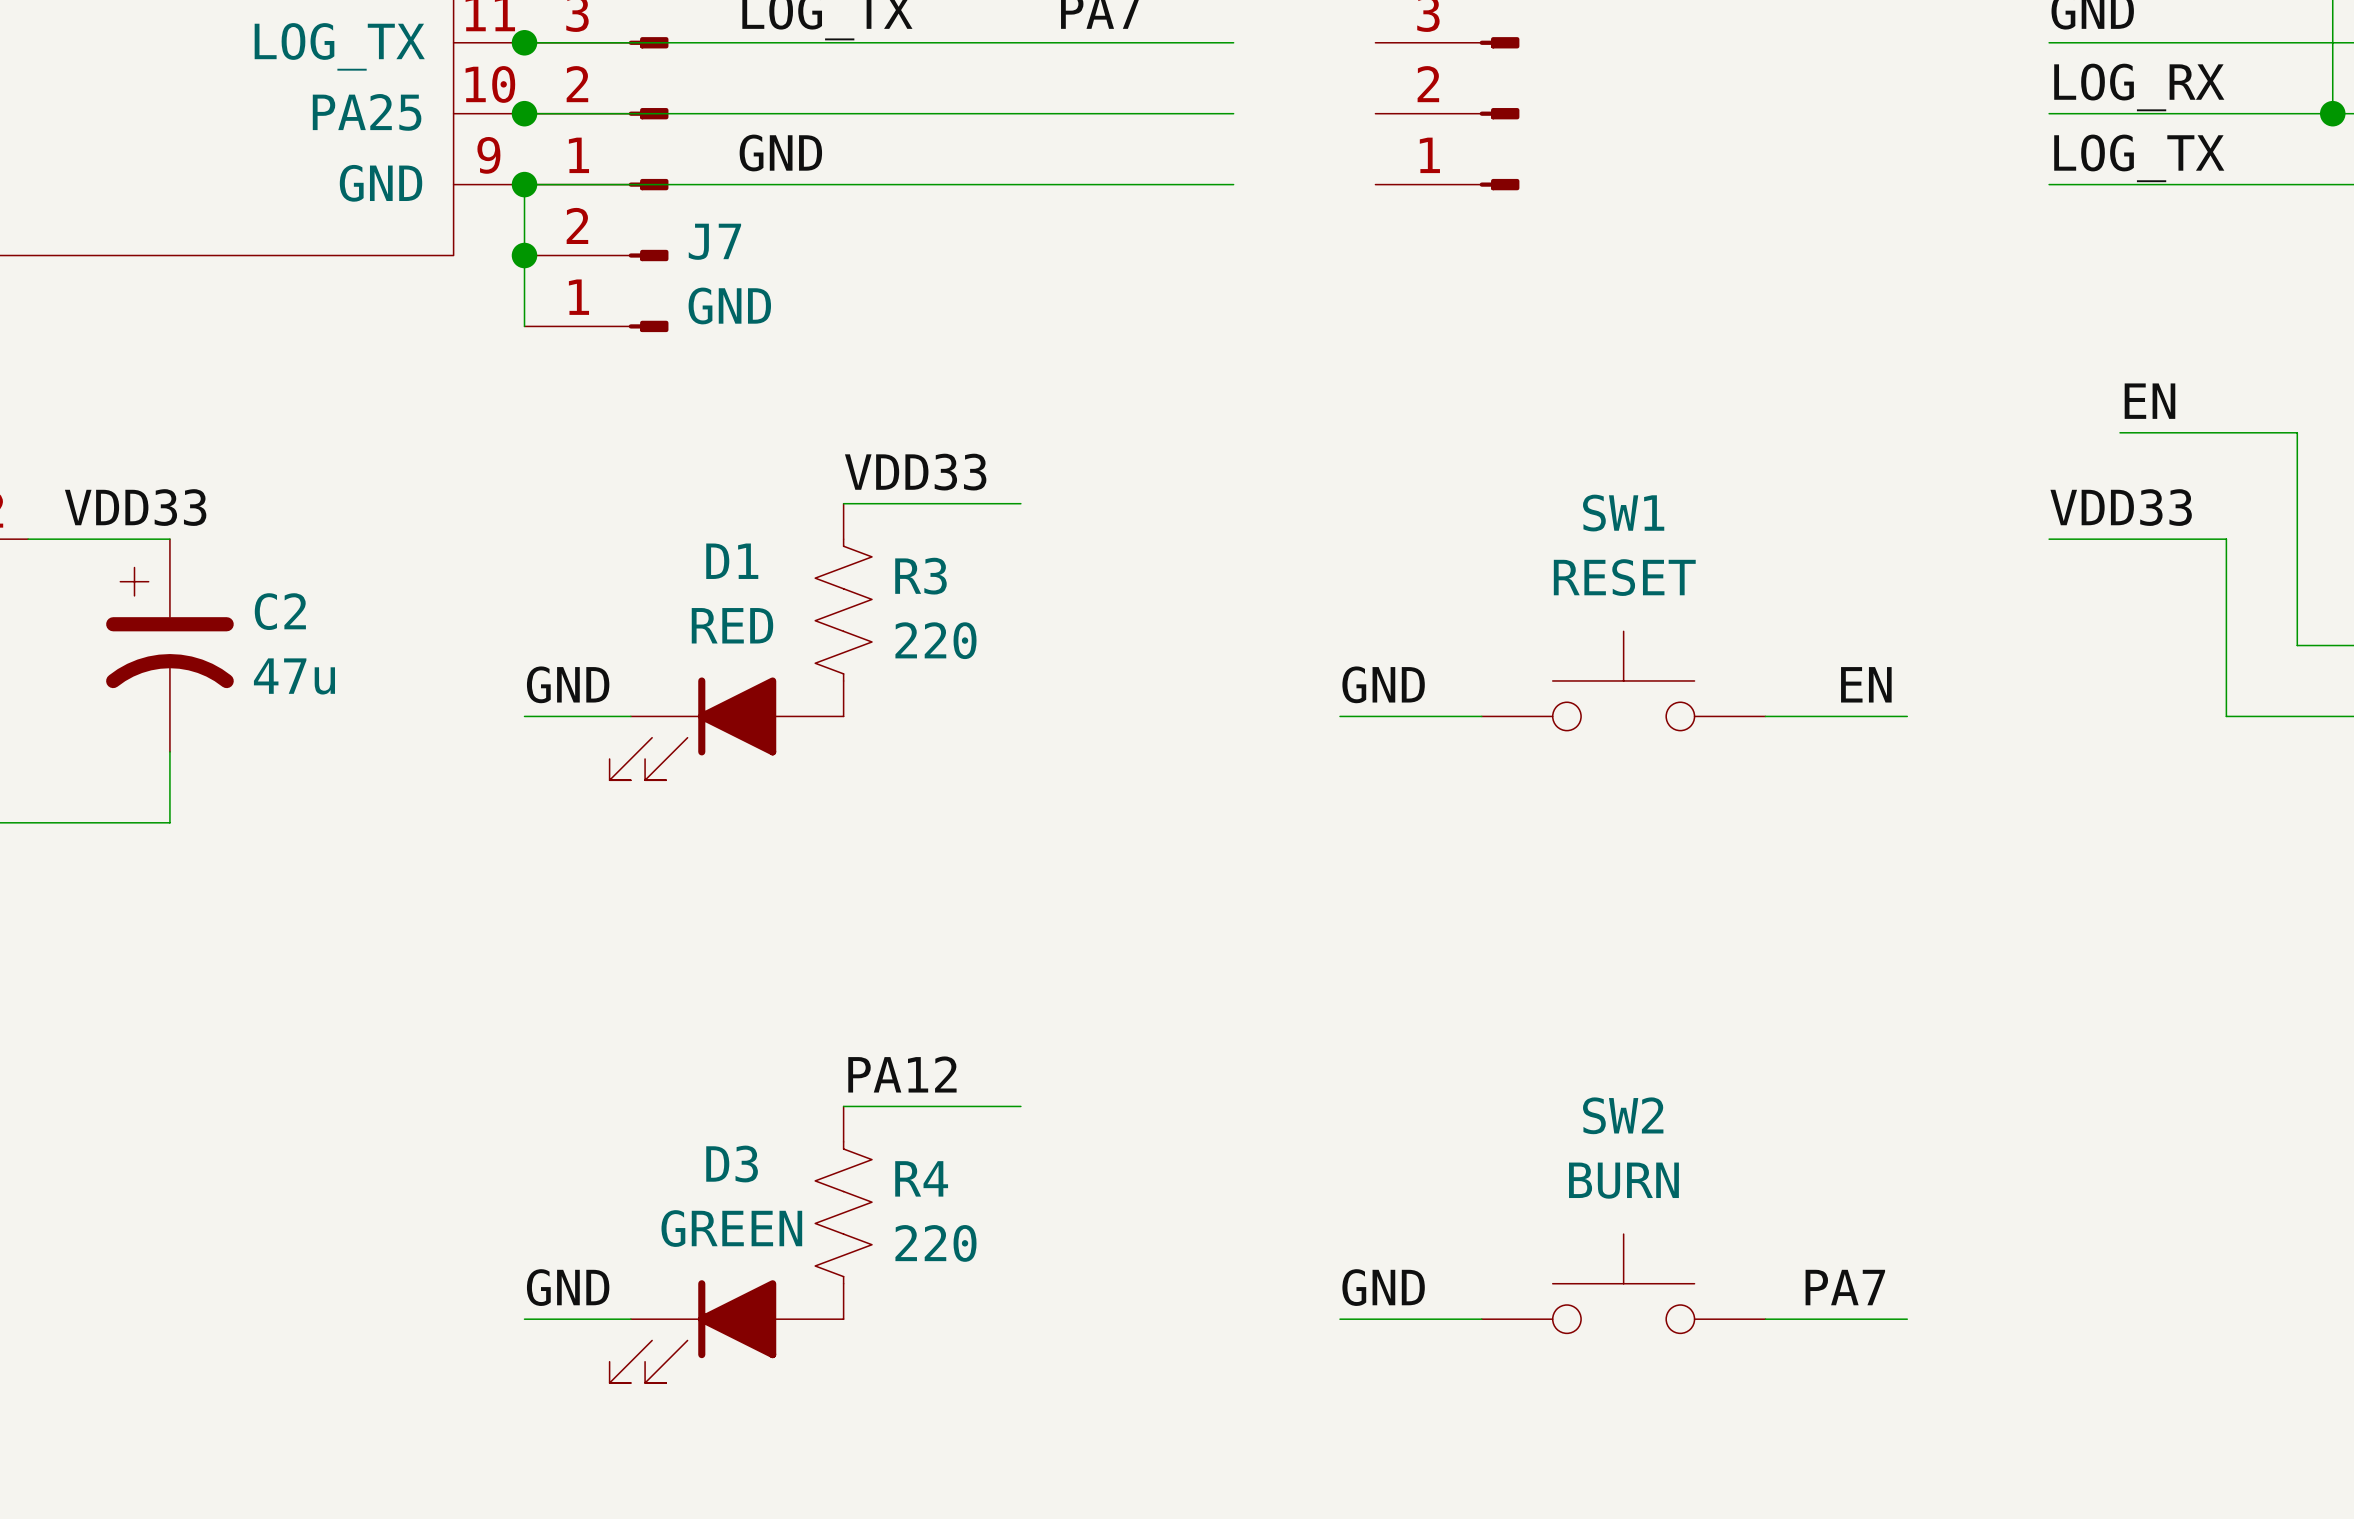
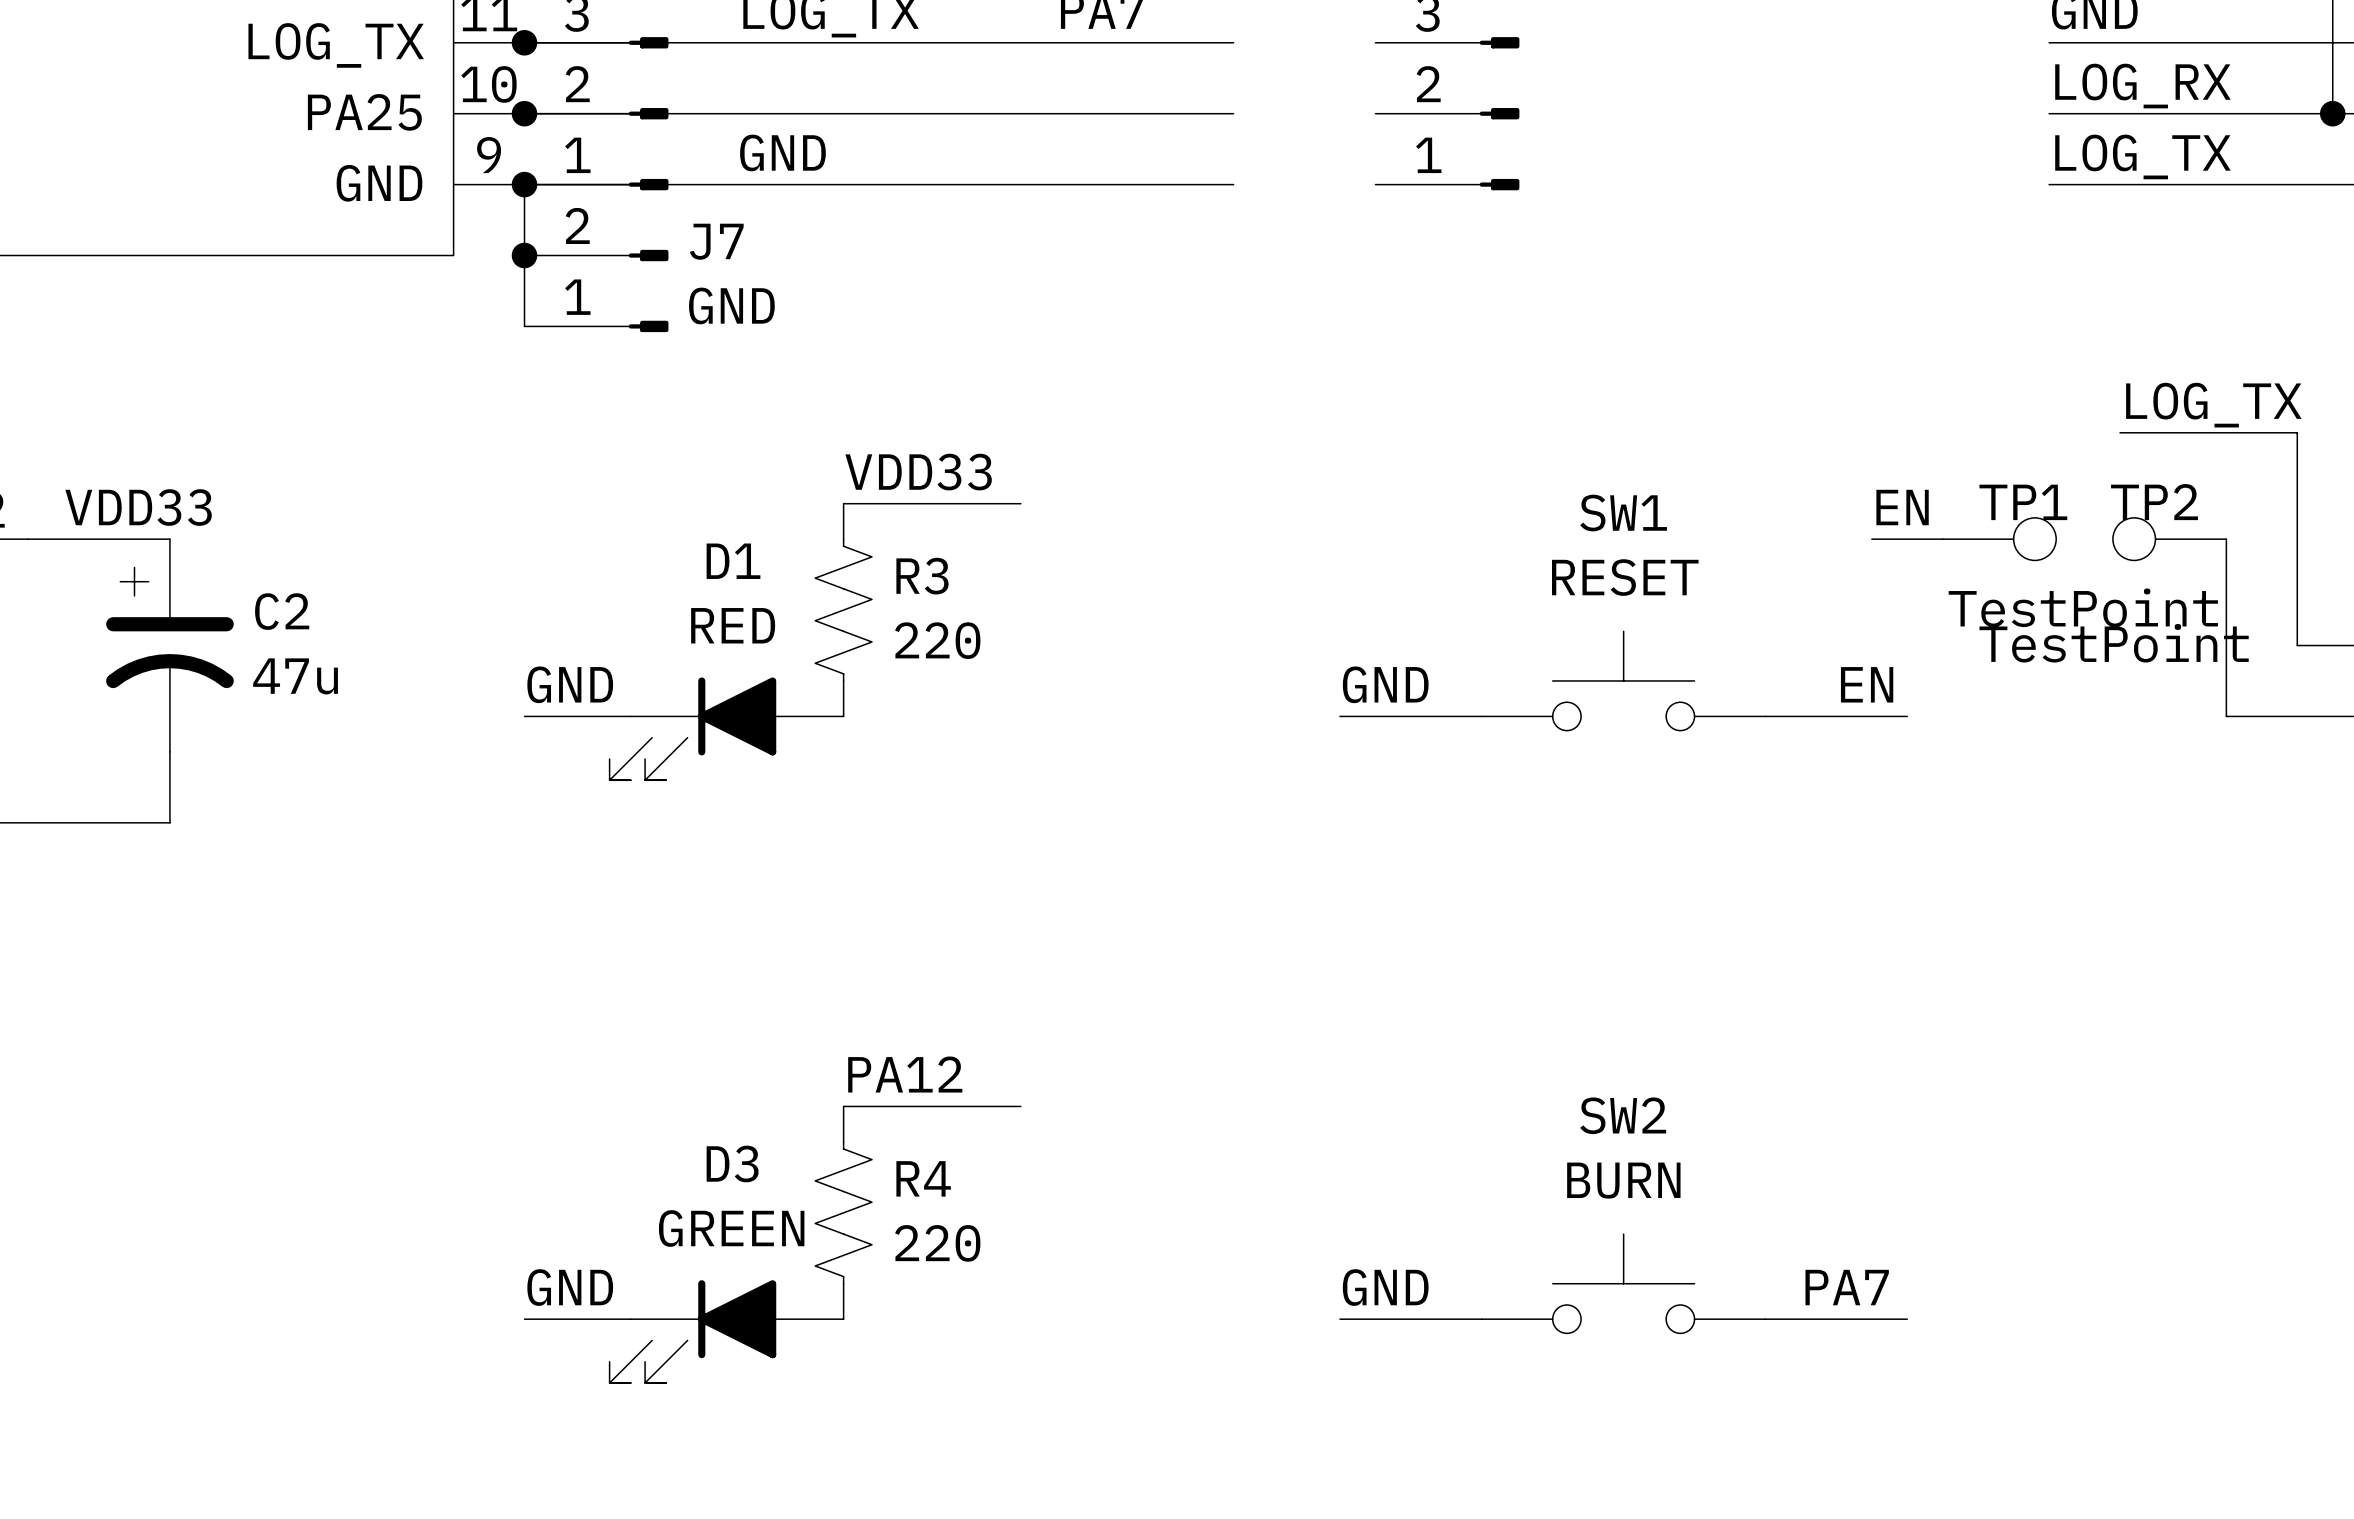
label: EN (2149, 401) -> LOG_TX (2213, 405)
label: none -> EN (1902, 507)
label: VDD33 (2121, 507) -> none
wire: none -> (1871, 539) (1942, 539)
TP1: none -> TestPoint (1999, 539)
wire: (2049, 539) (2226, 539) -> none
TP2: none -> TestPoint (2169, 539)

